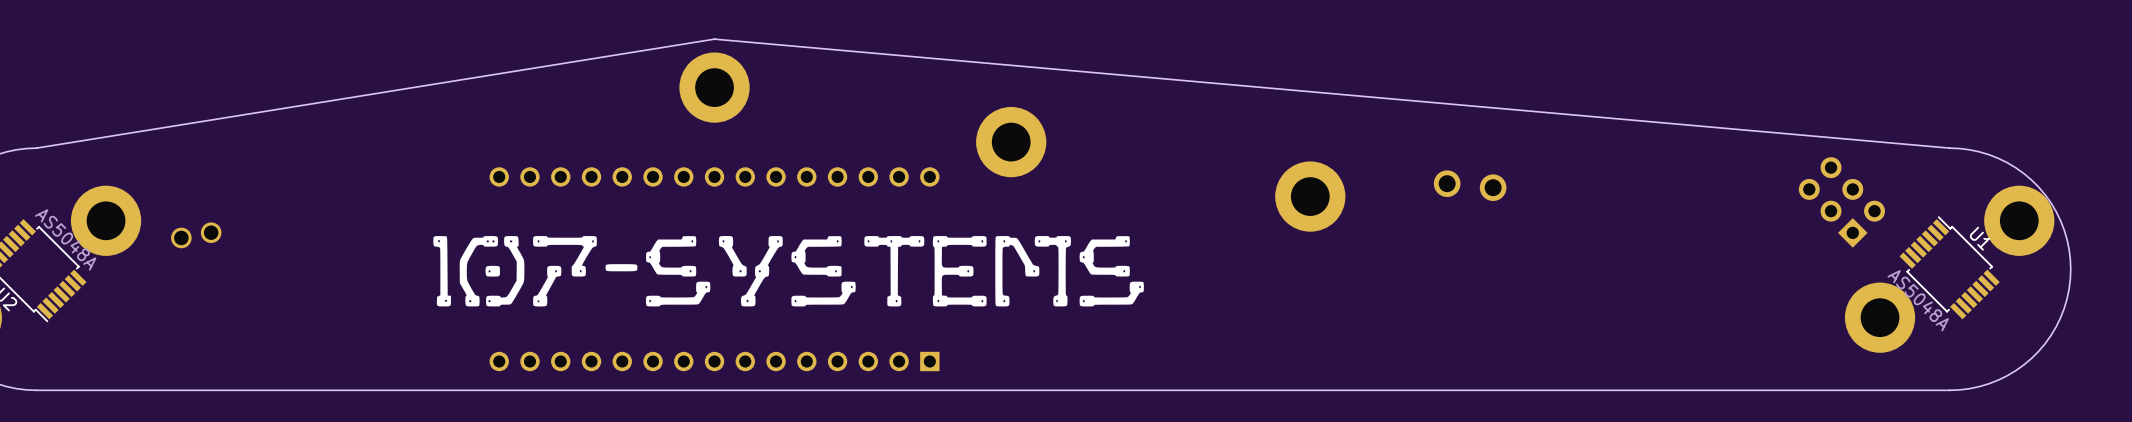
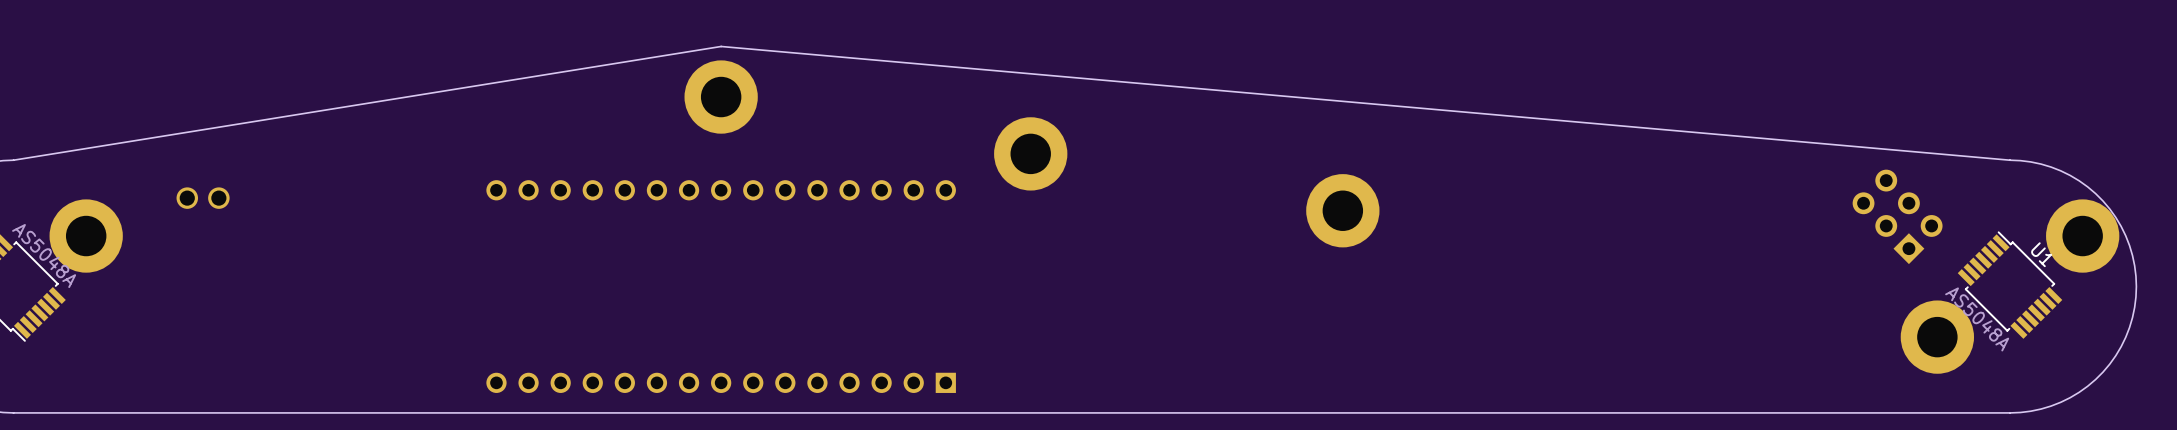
part: none -> (203, 198)
part: (1470, 185) -> none
part: (196, 235) -> none
drawing: [433, 236, 1144, 307] -> none

